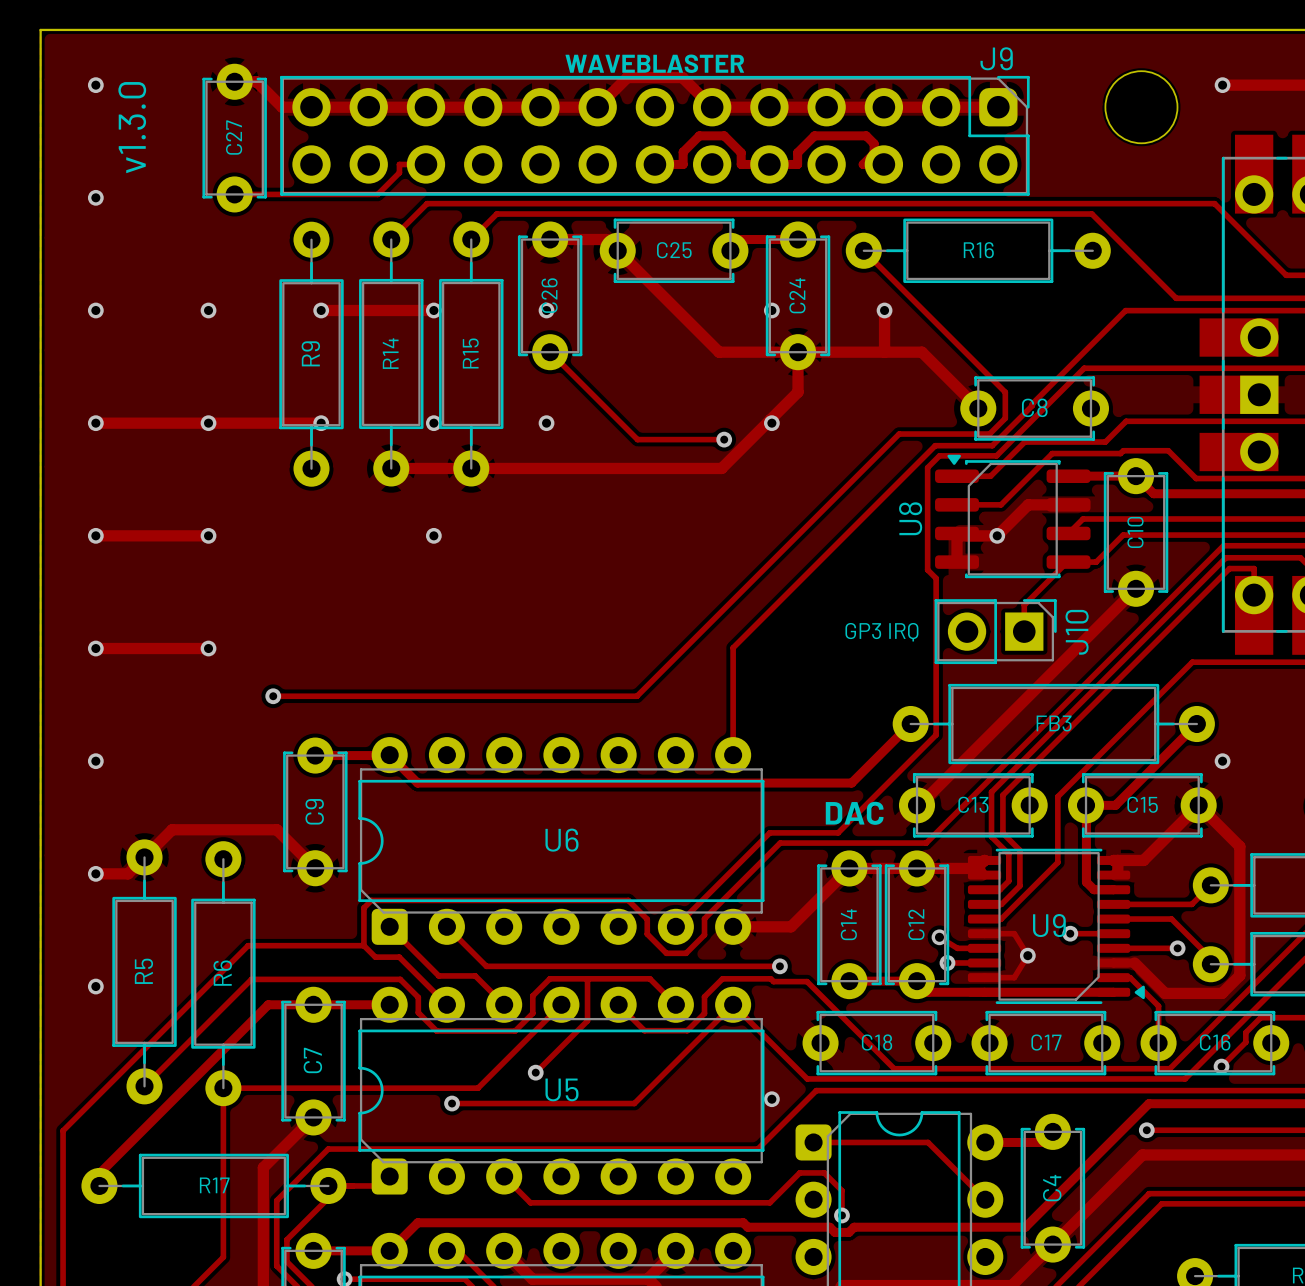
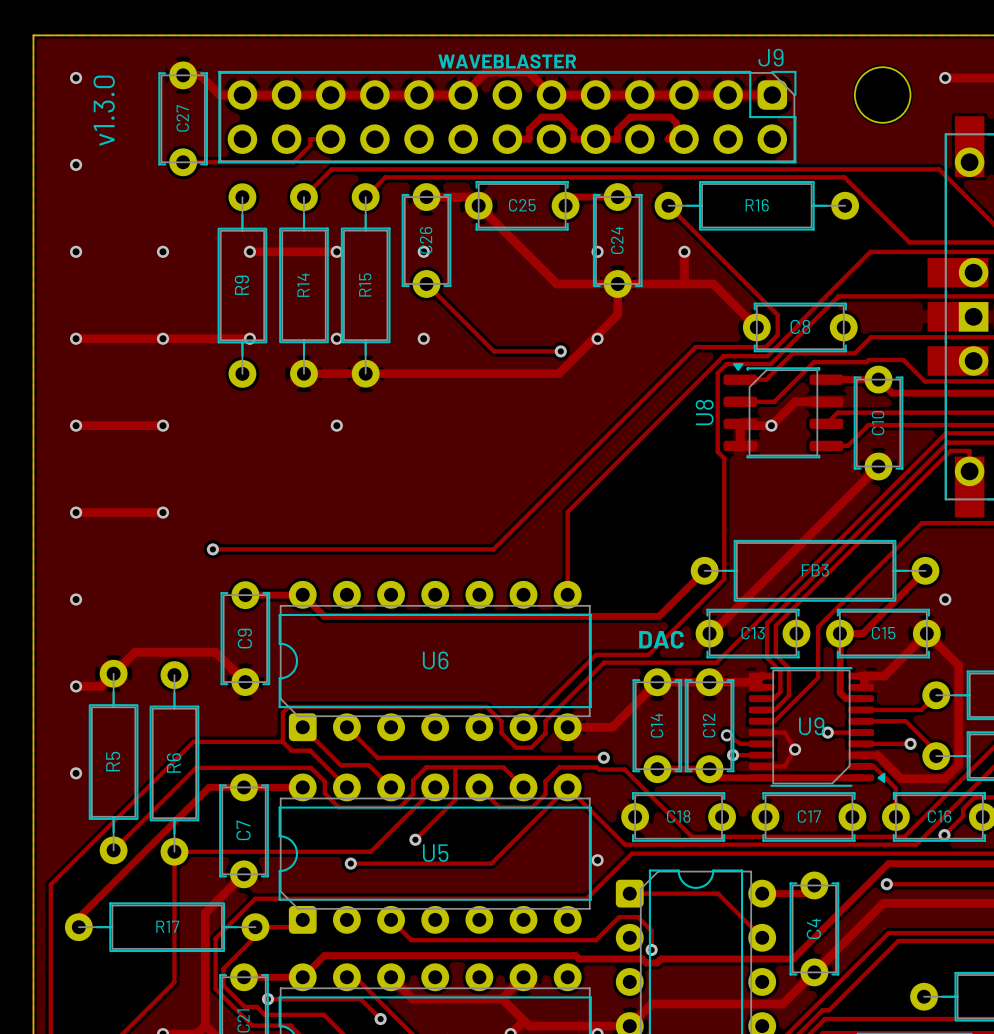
track: (1067, 562) (1024, 605) (1024, 631) -> none
J10: (995, 631) -> none
text: GP3 IRQ (881, 632) -> none

